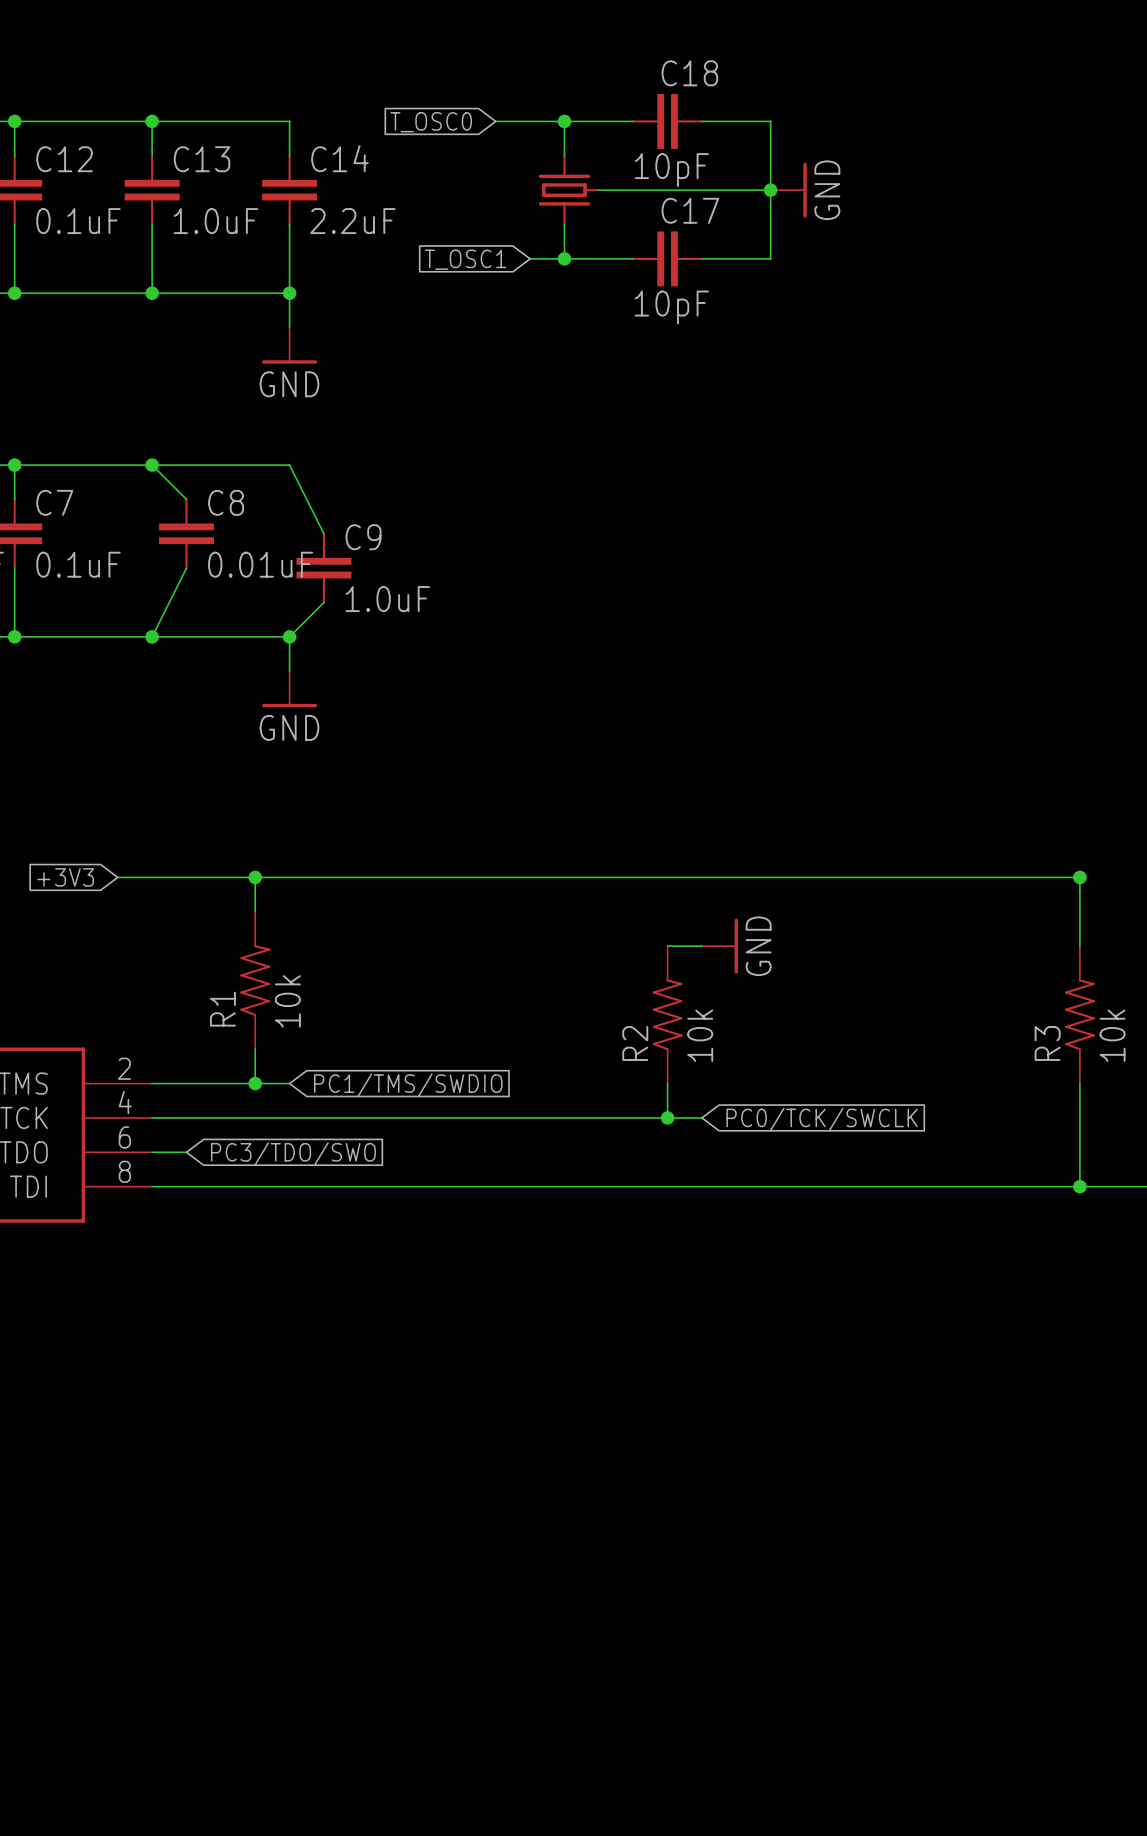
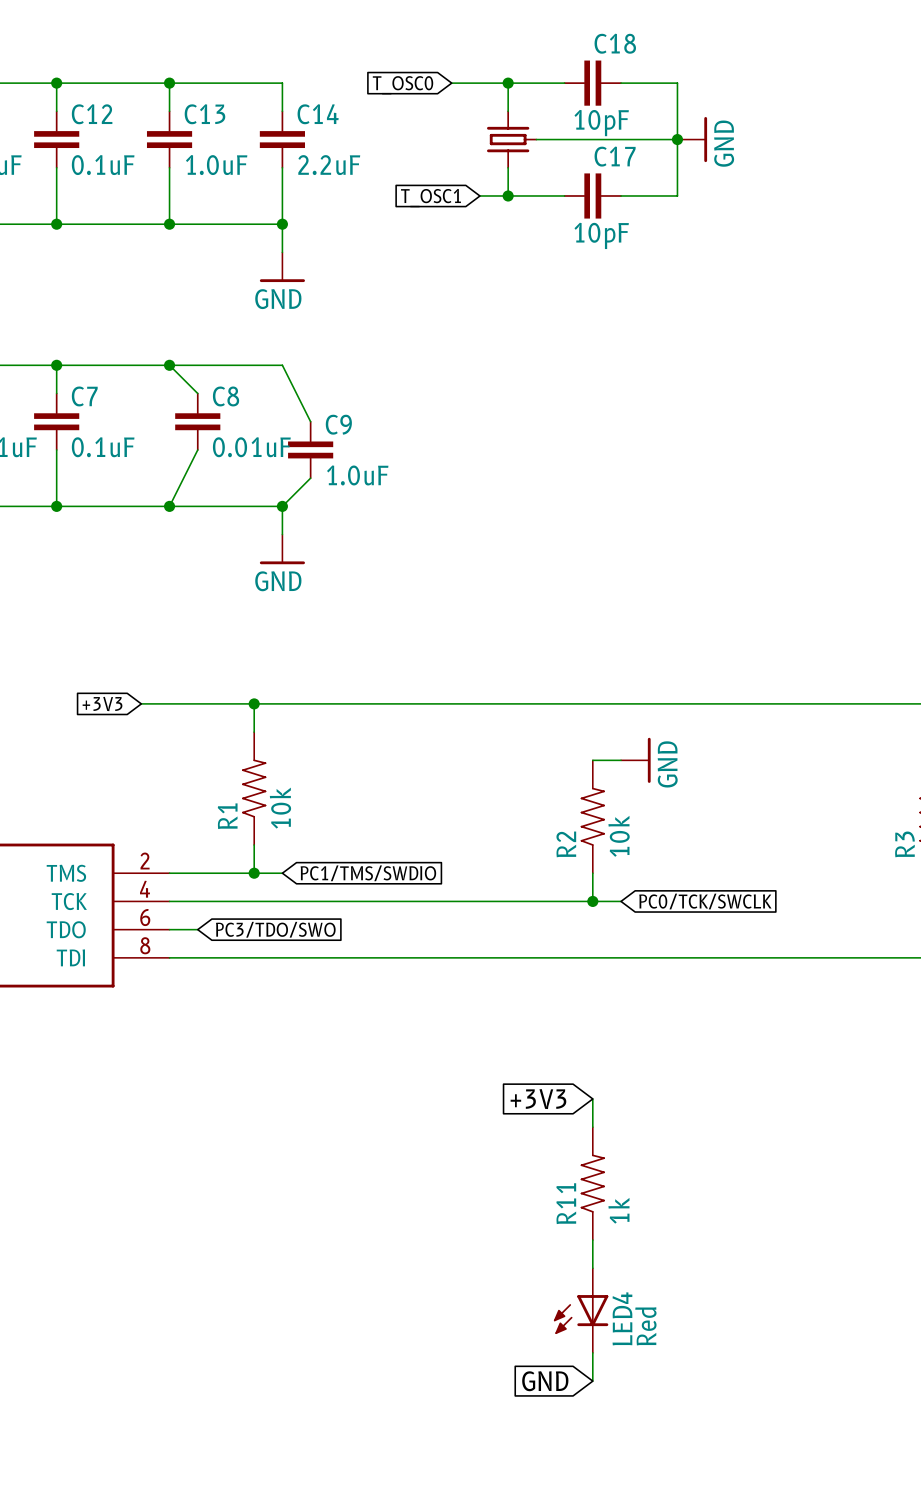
global label: none -> +3V3 (538, 1099)
wire: none -> (592, 1098) (592, 1127)
R11: none -> 1k (592, 1183)
wire: none -> (592, 1240) (592, 1268)
LED4: none -> Red (581, 1310)
wire: none -> (592, 1352) (592, 1381)
global label: none -> GND (545, 1381)

